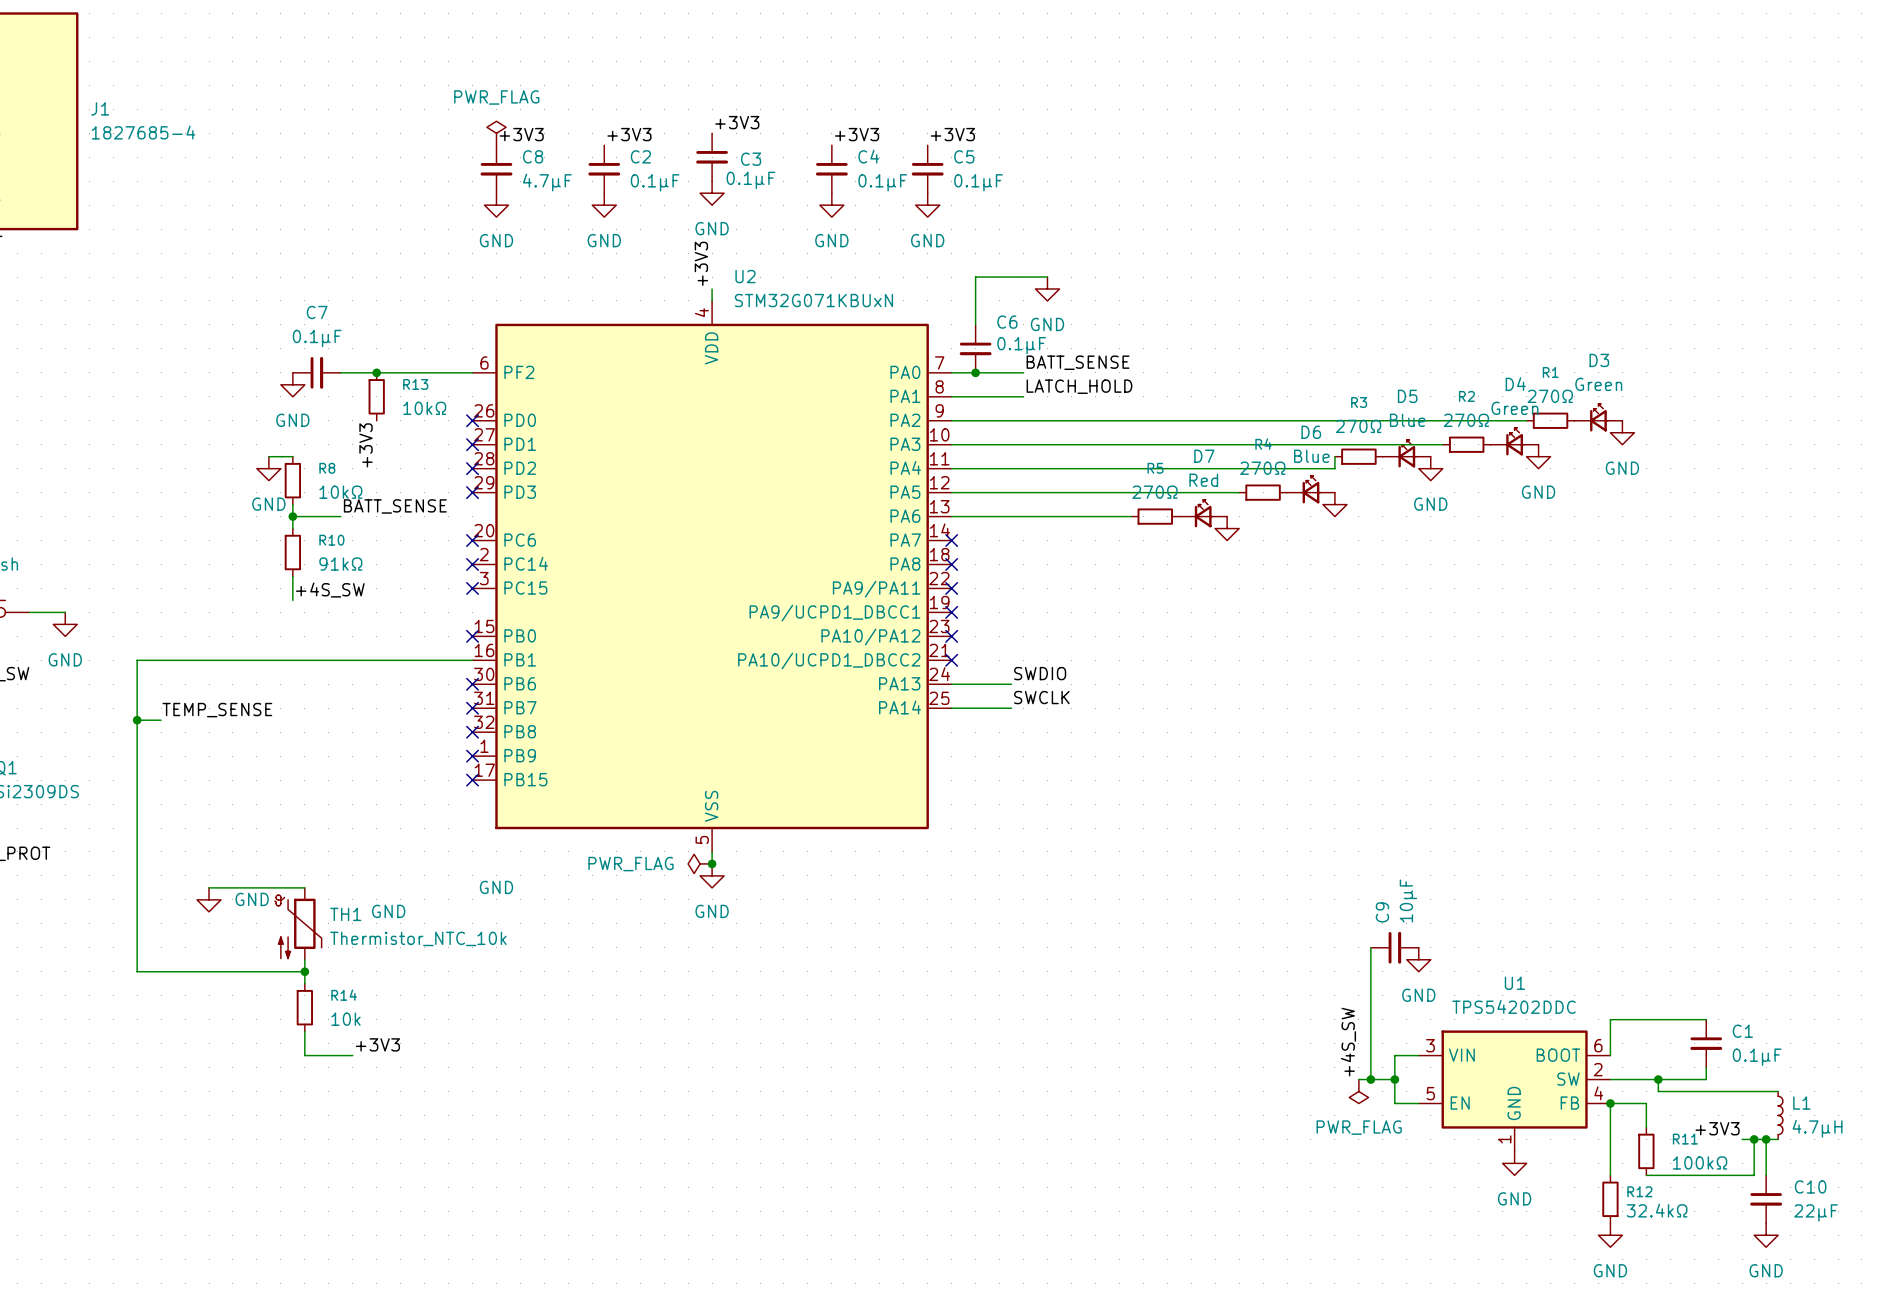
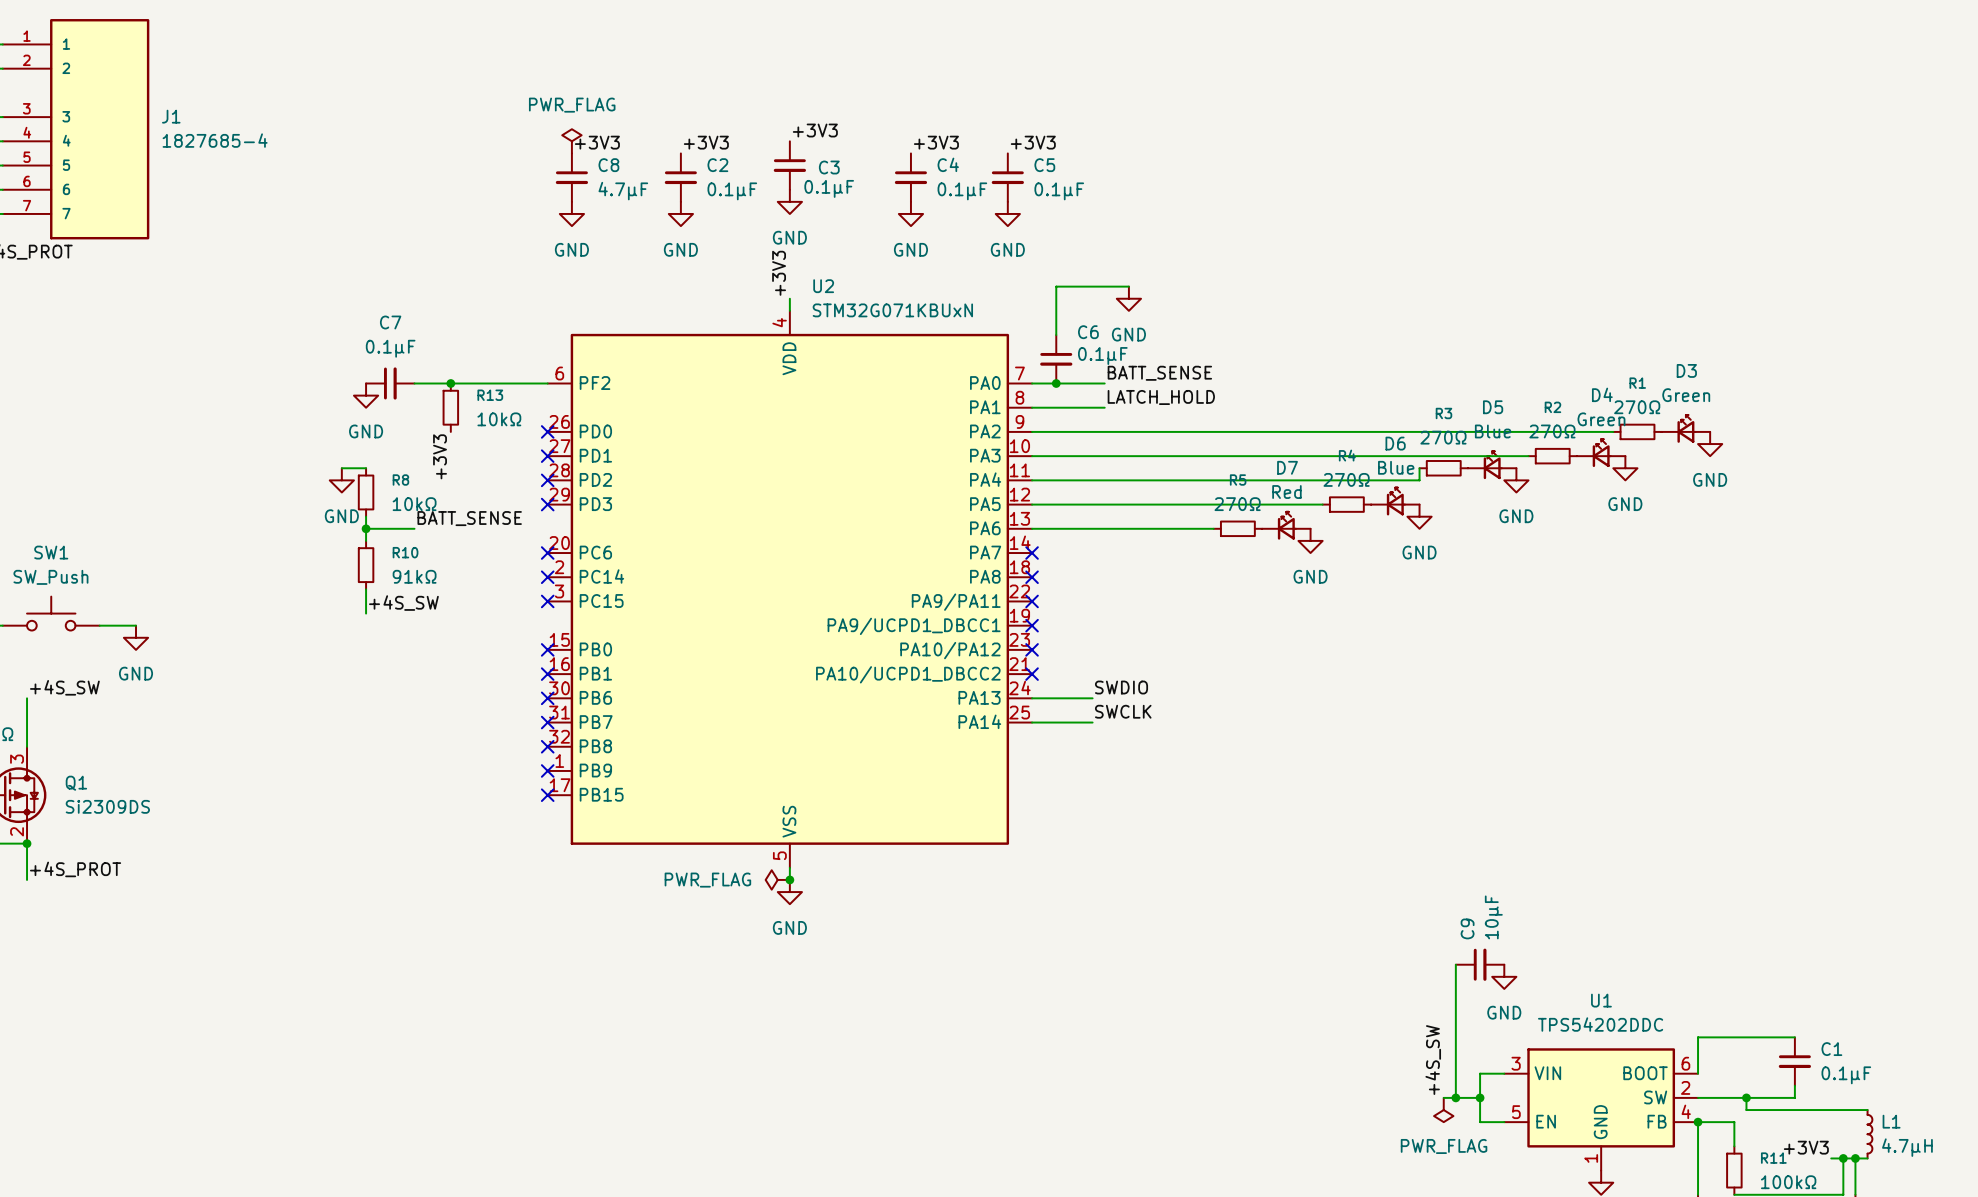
wire: (472, 660) (137, 660) (137, 971) (304, 971) -> none
no-connect mark: none -> (547, 674)
label: TEMP_SENSE (217, 710) -> none
wire: (137, 720) (161, 720) -> none
junction: (137, 720) -> none
wire: (209, 887) (304, 887) -> none
power symbol text position: GND (496, 887) -> GND (1419, 552)
power symbol: GND (209, 899) -> none
power symbol text position: GND (388, 911) -> GND (1310, 576)
TH1: Thermistor_NTC_10k (298, 923) -> none
wire: (304, 959) (304, 983) -> none
junction: (304, 971) -> none
R14: 10k (304, 1007) -> none
wire: (304, 1031) (304, 1055) (352, 1055) -> none
label: +3V3 (377, 1044) -> none

